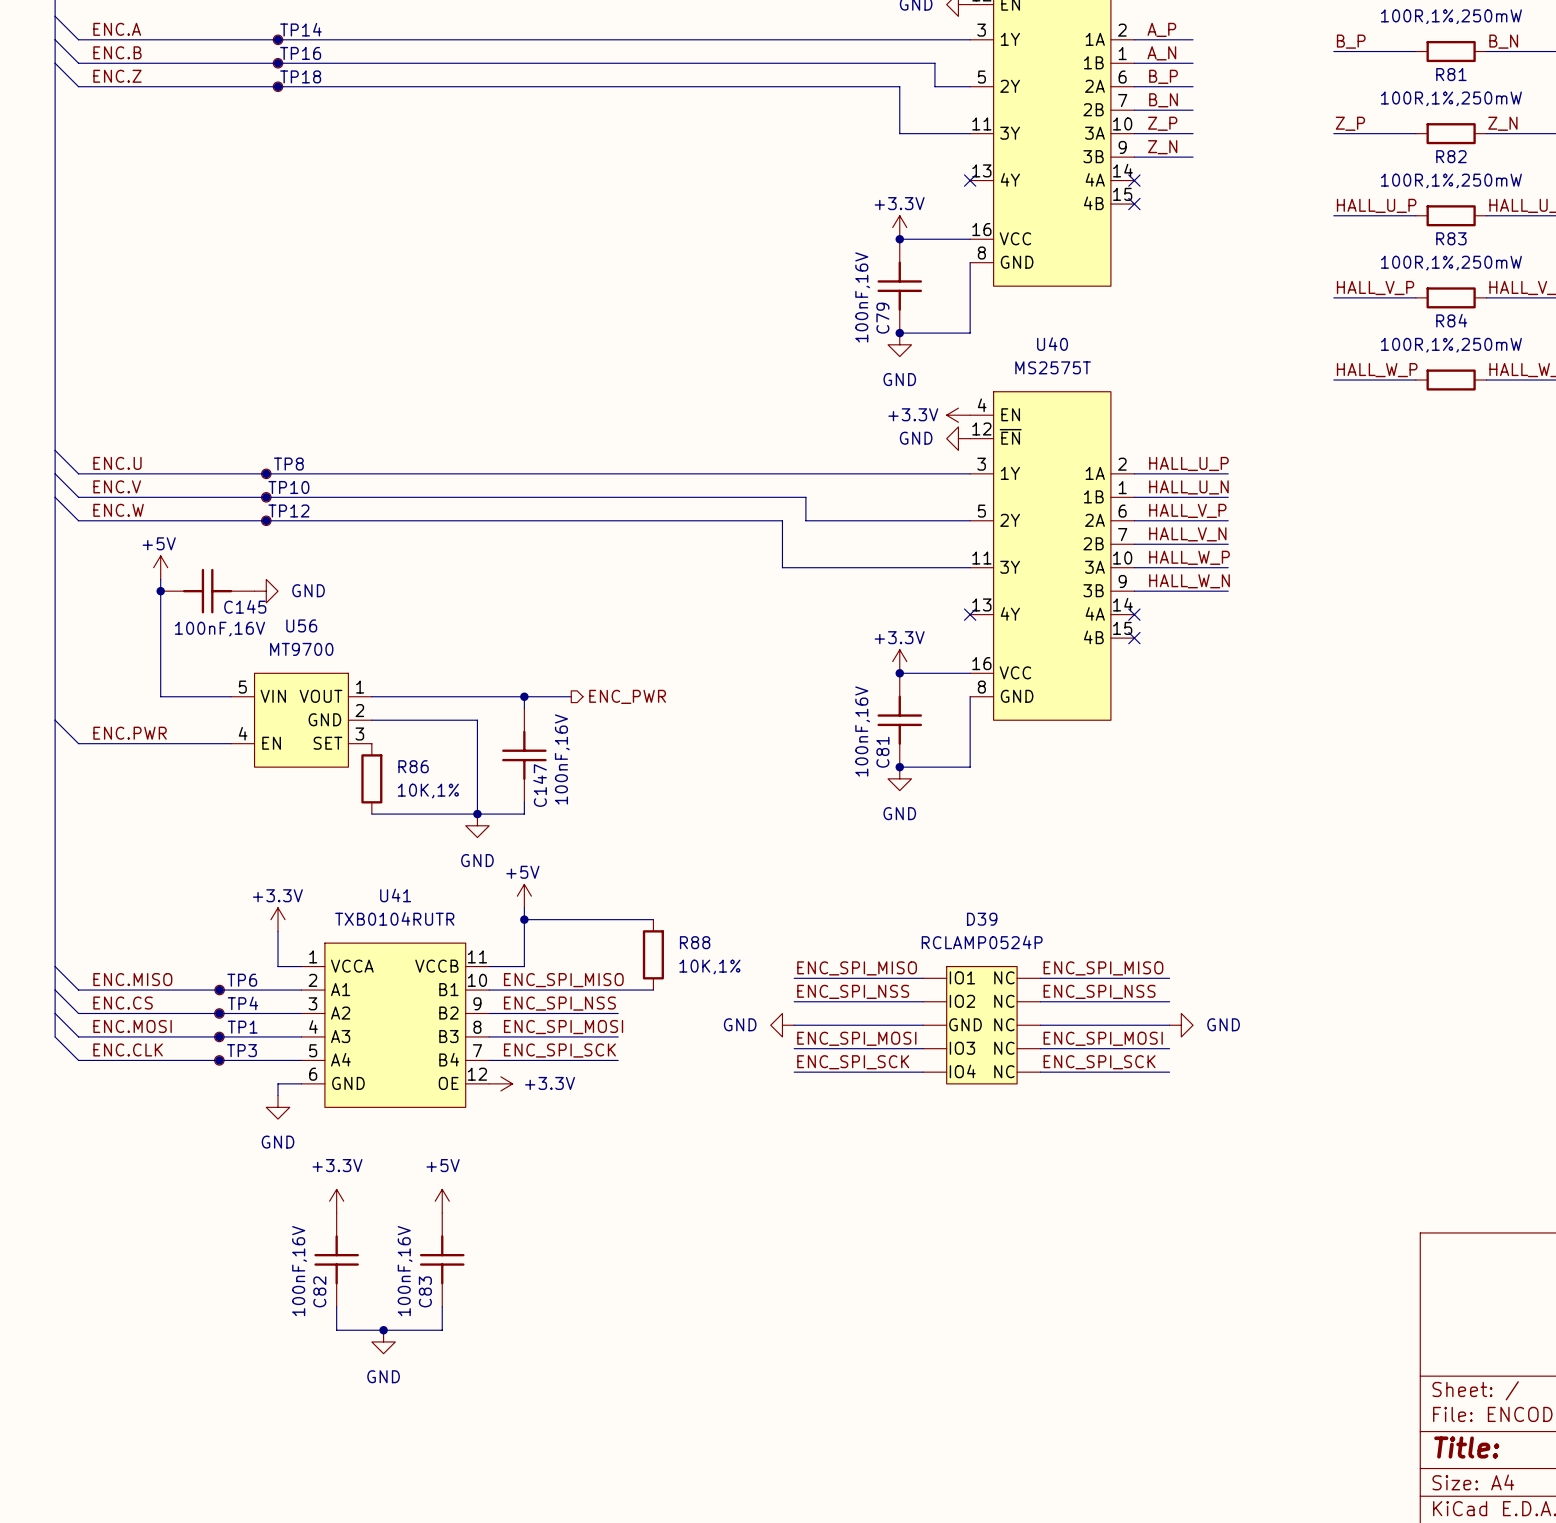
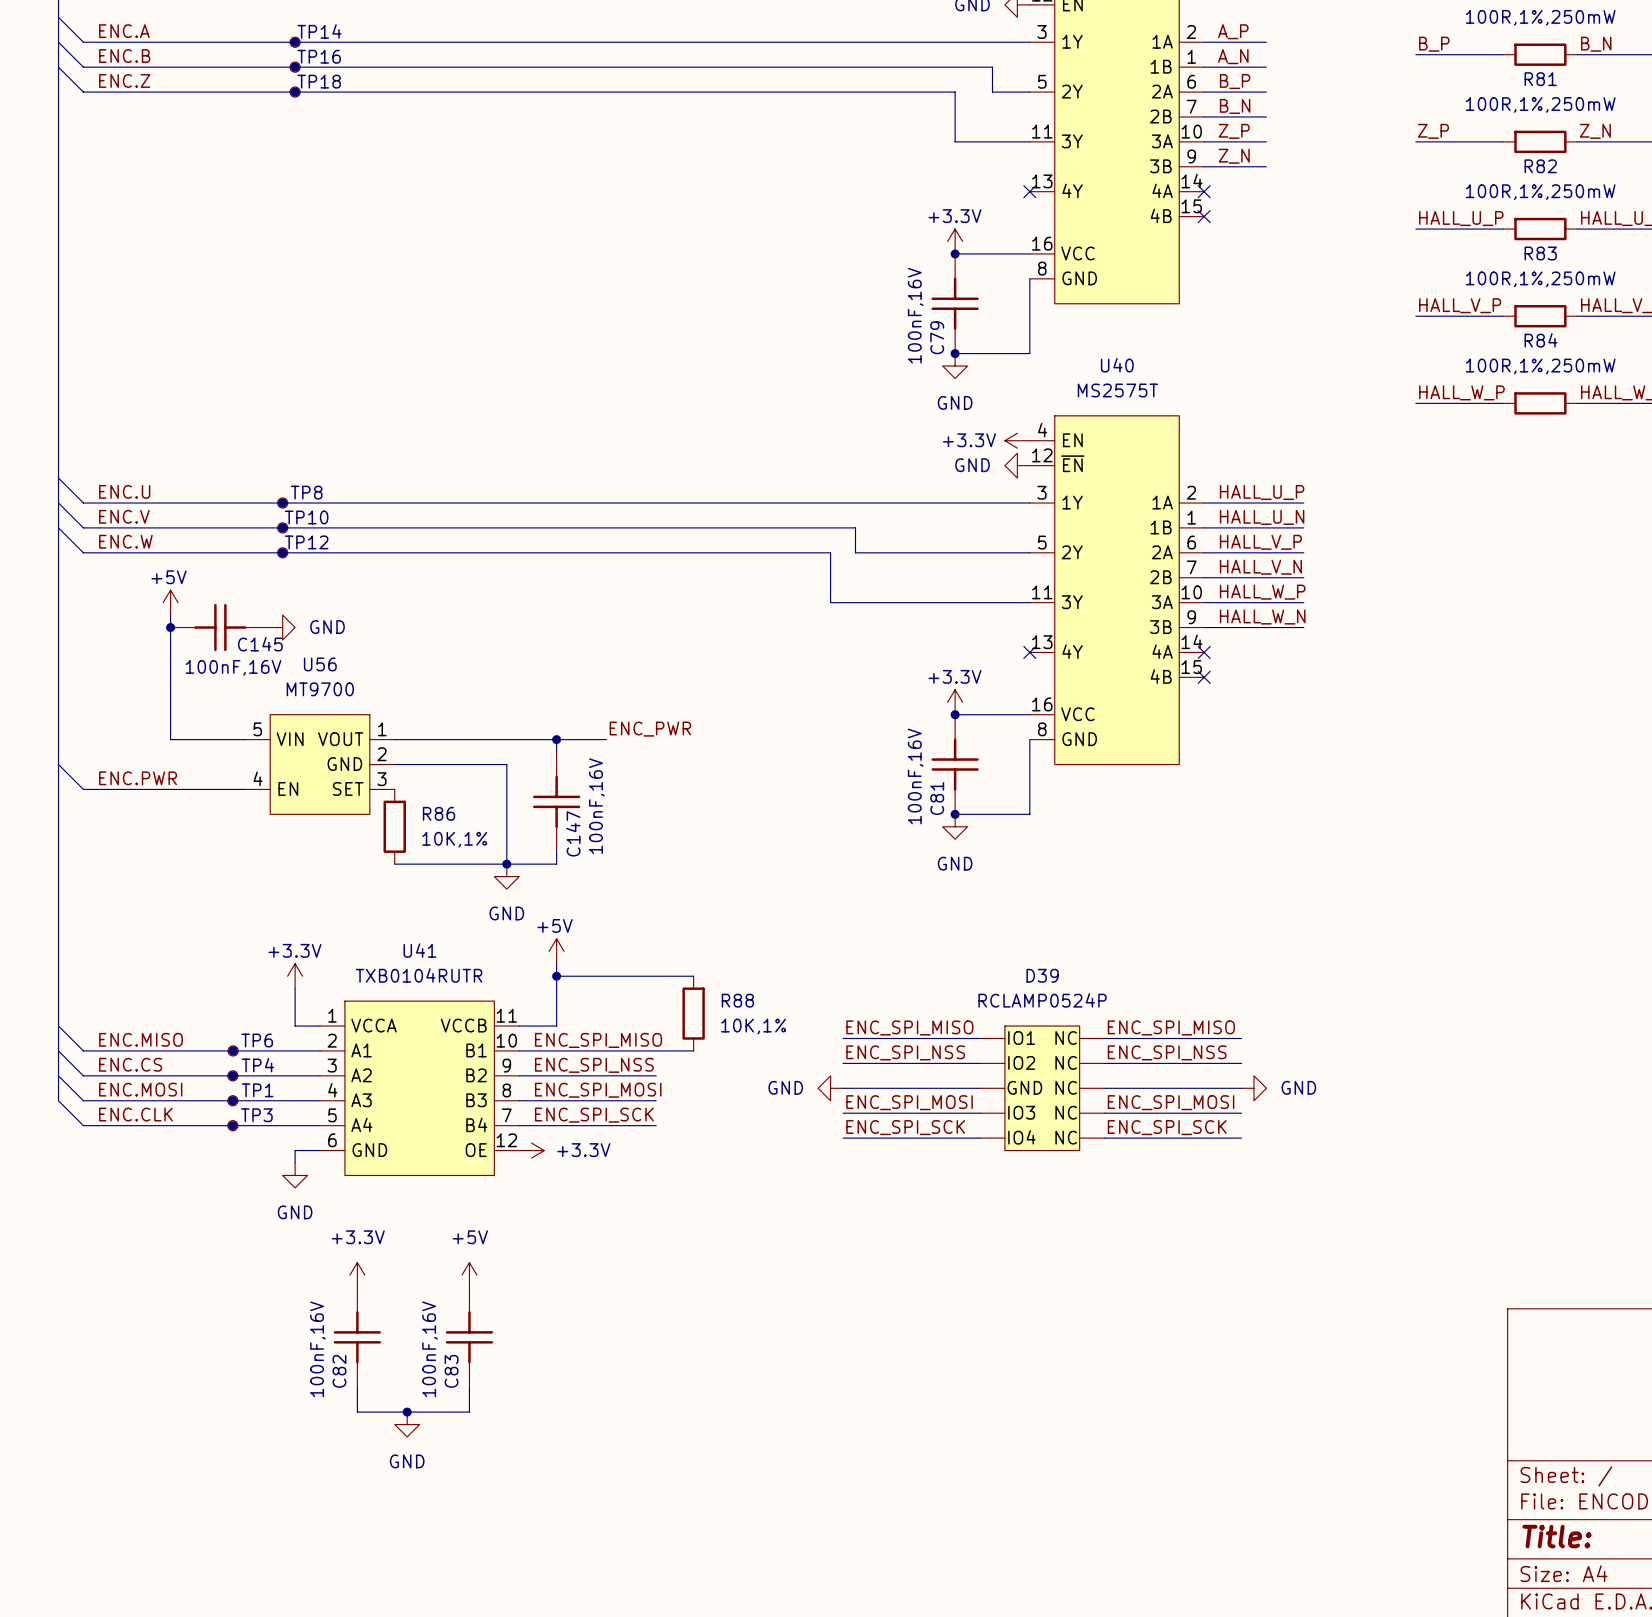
label: none -> ENC_PWR (650, 729)
hierarchical label: ENC_PWR (627, 696) -> none

